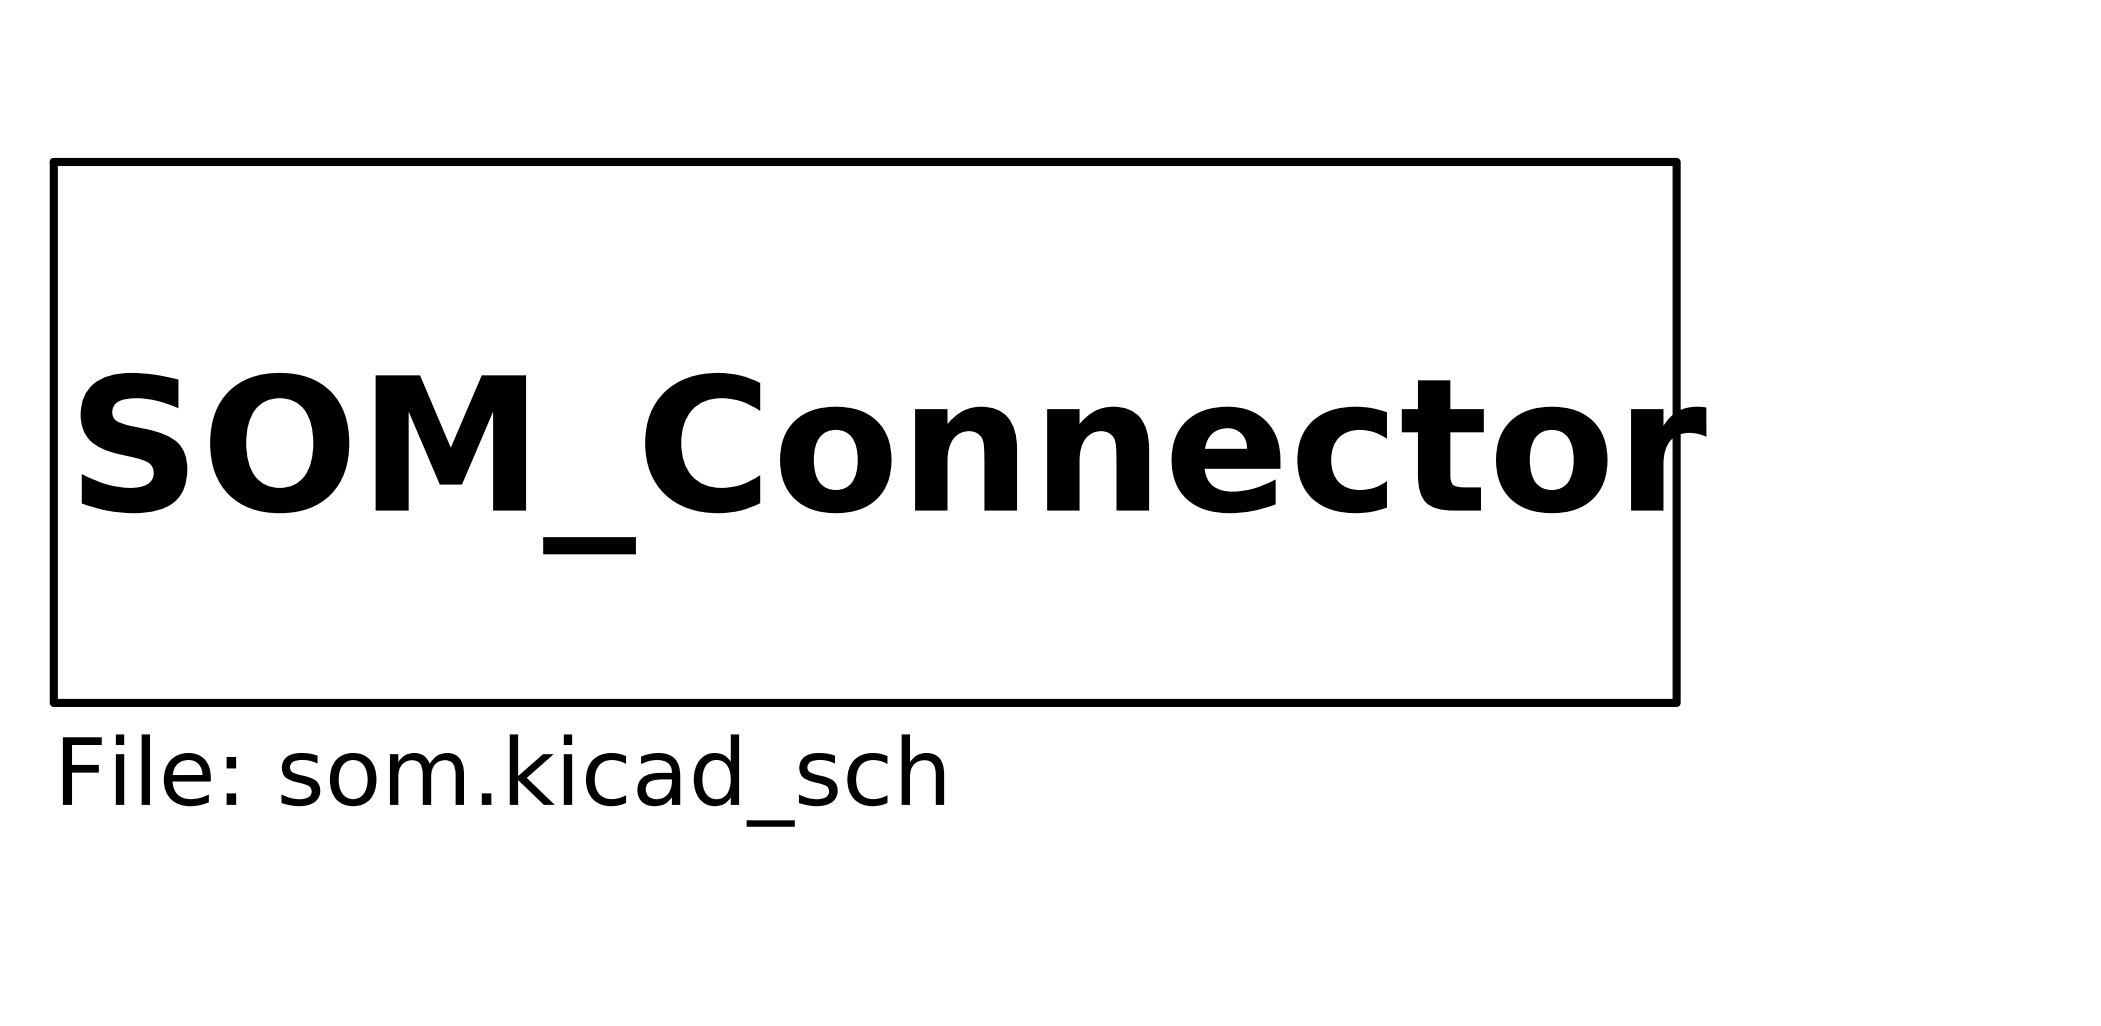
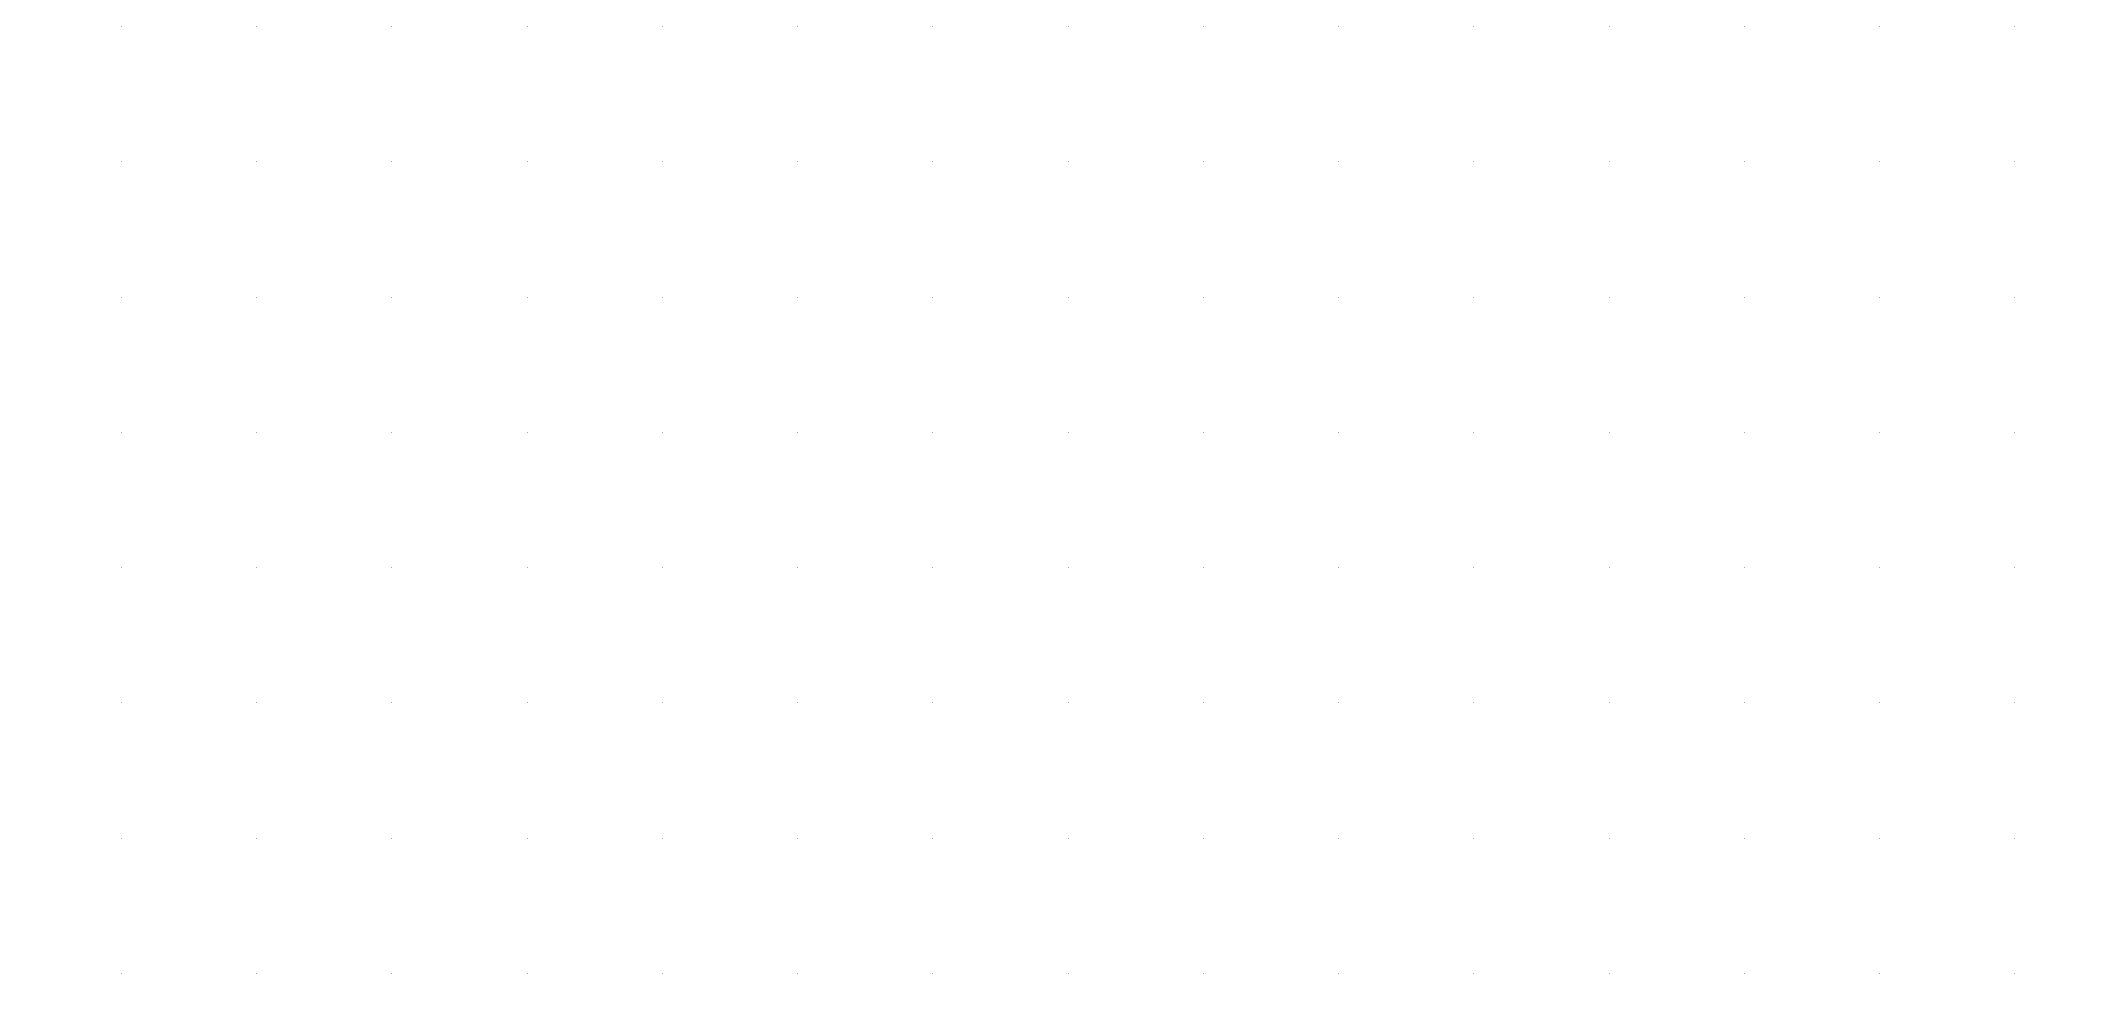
sheet SOM_Connector: File: som.kicad_sch (865, 432) -> none

